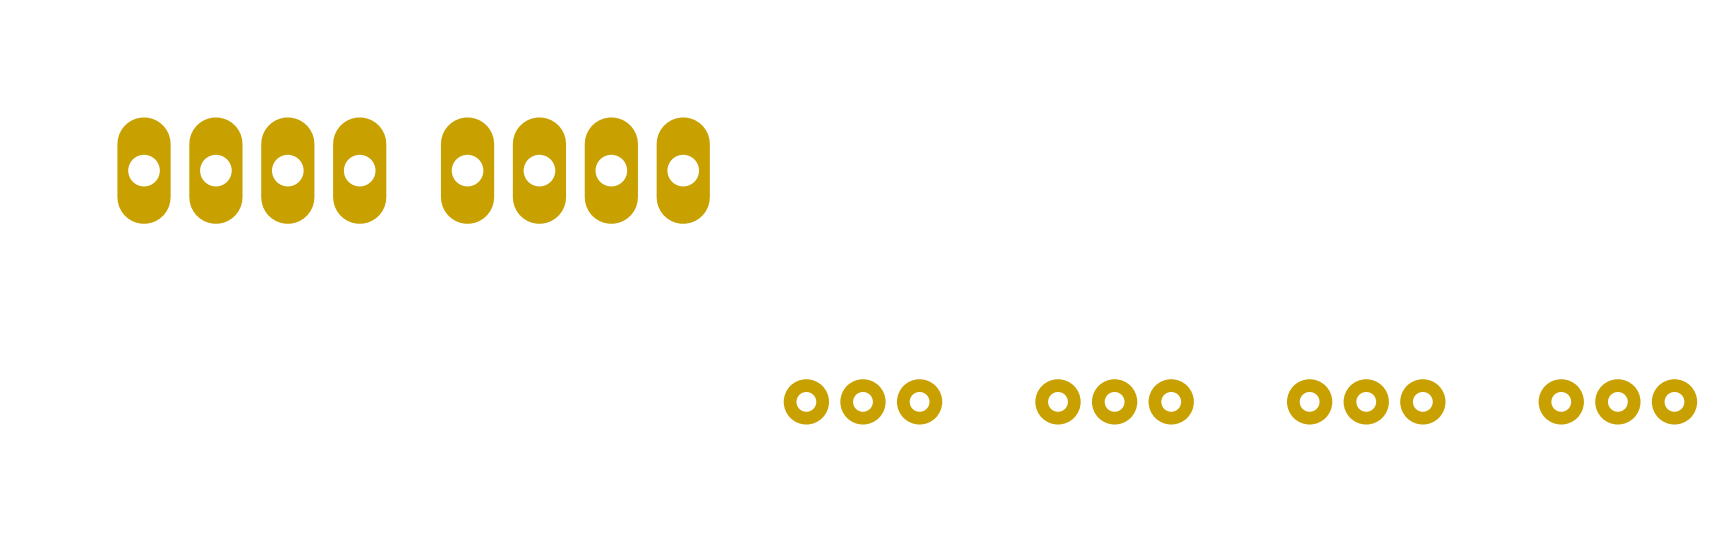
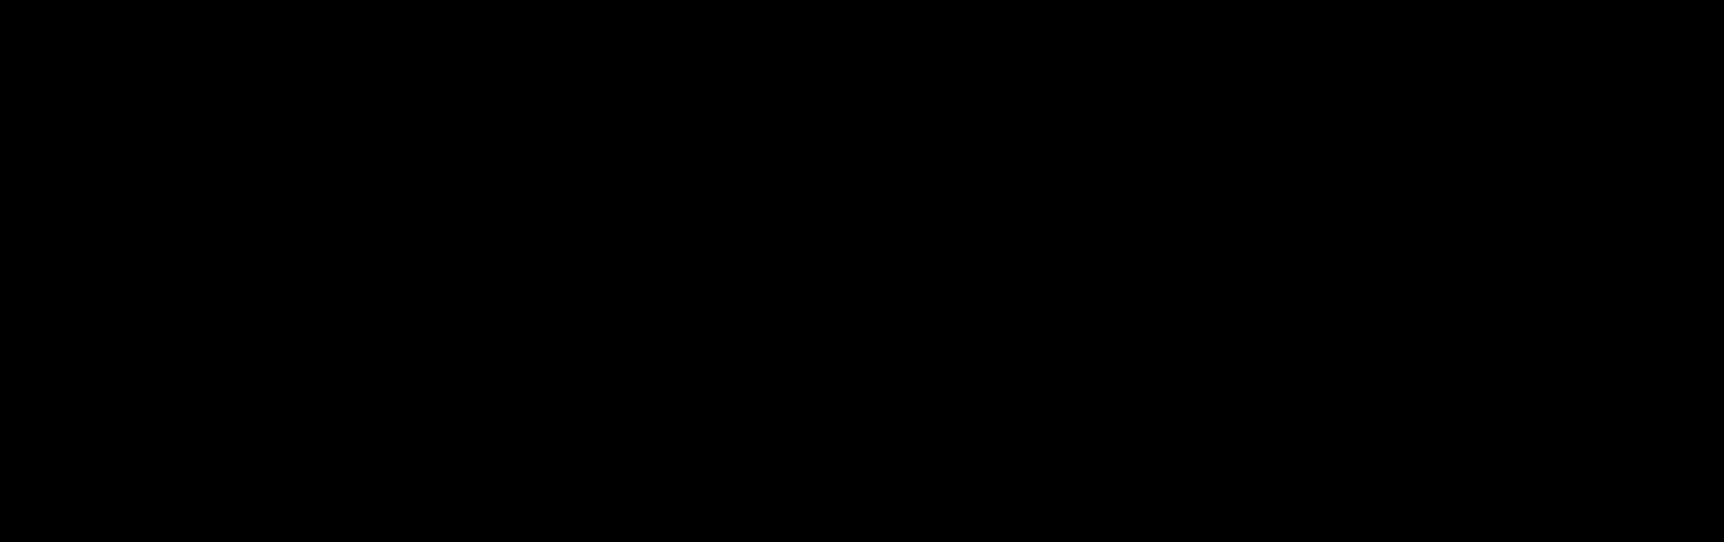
part: (251, 170) -> none
part: (575, 170) -> none
part: (862, 401) -> none
part: (1114, 401) -> none
part: (1366, 401) -> none
part: (1617, 401) -> none

